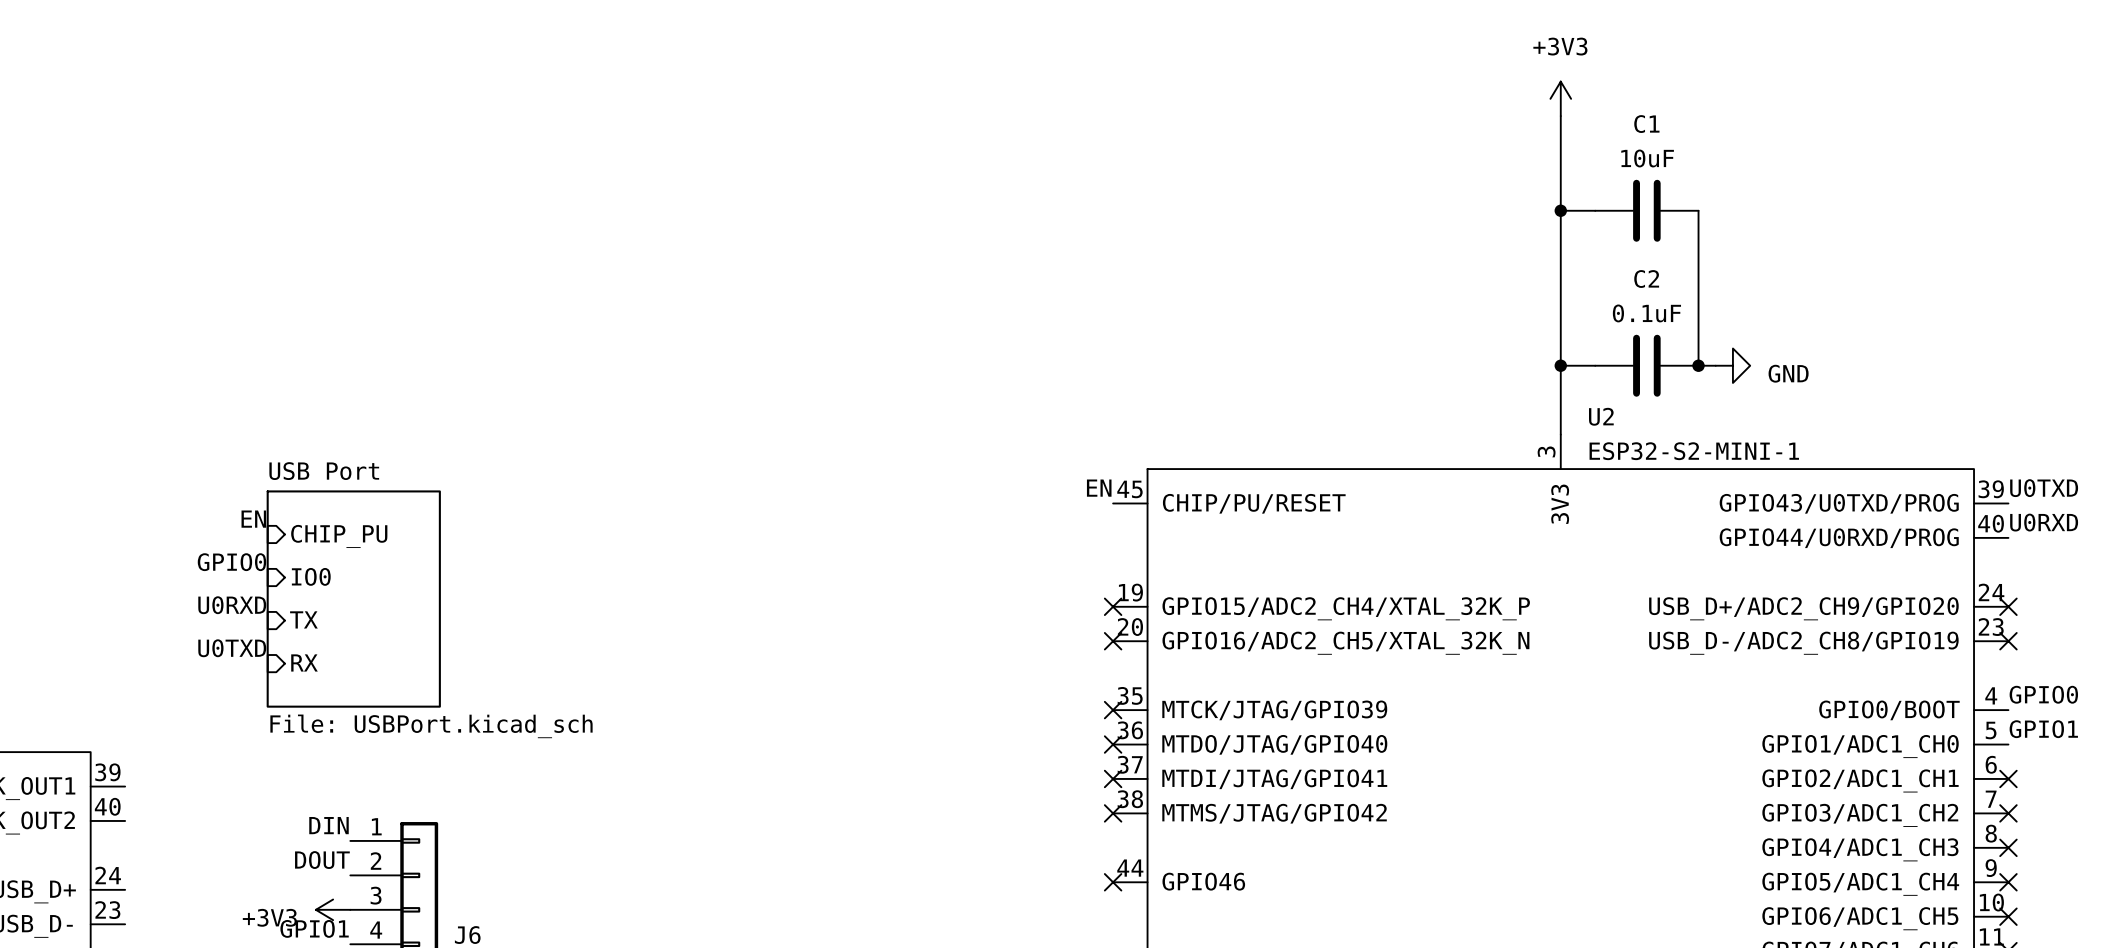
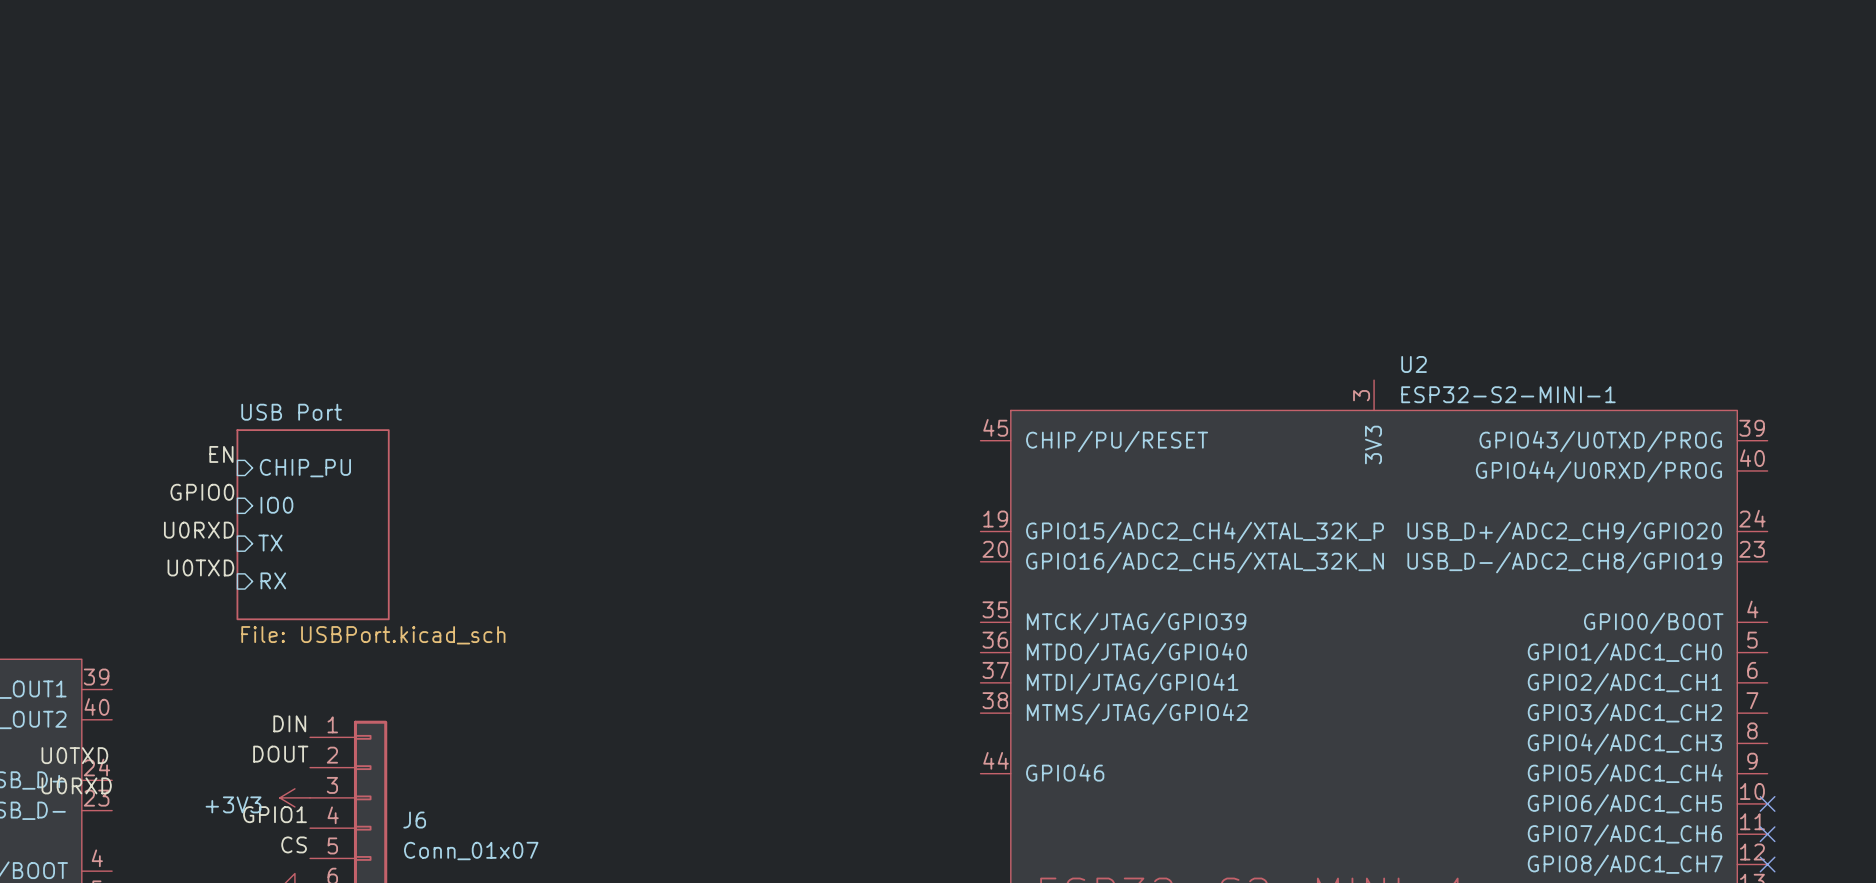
power symbol: +3V3 (1560, 98) -> none
wire: (1560, 116) (1560, 434) -> none
wire: (1560, 210) (1595, 210) -> none
junction: (1560, 210) -> none
C1: 10uF (1646, 210) -> none
wire: (1698, 210) (1698, 365) (1715, 365) -> none
wire: (1560, 365) (1595, 365) -> none
junction: (1560, 365) -> none
C2: 0.1uF (1646, 365) -> none
junction: (1698, 365) -> none
power symbol: GND (1732, 365) -> none
label: EN (1099, 488) -> none
label: U0TXD (2044, 488) -> none
label: U0RXD (2044, 522) -> none
no-connect mark: (1113, 606) -> none
no-connect mark: (2008, 606) -> none
no-connect mark: (1113, 641) -> none
no-connect mark: (2008, 641) -> none
label: GPIO0 (2043, 694) -> none
no-connect mark: (1113, 710) -> none
label: GPIO1 (2043, 729) -> none
no-connect mark: (1113, 744) -> none
no-connect mark: (1113, 778) -> none
no-connect mark: (2008, 778) -> none
no-connect mark: (1113, 813) -> none
no-connect mark: (2008, 813) -> none
no-connect mark: (2008, 847) -> none
label: none -> U0TXD (74, 755)
no-connect mark: (1113, 882) -> none
no-connect mark: (2008, 882) -> none
label: none -> U0RXD (76, 785)

